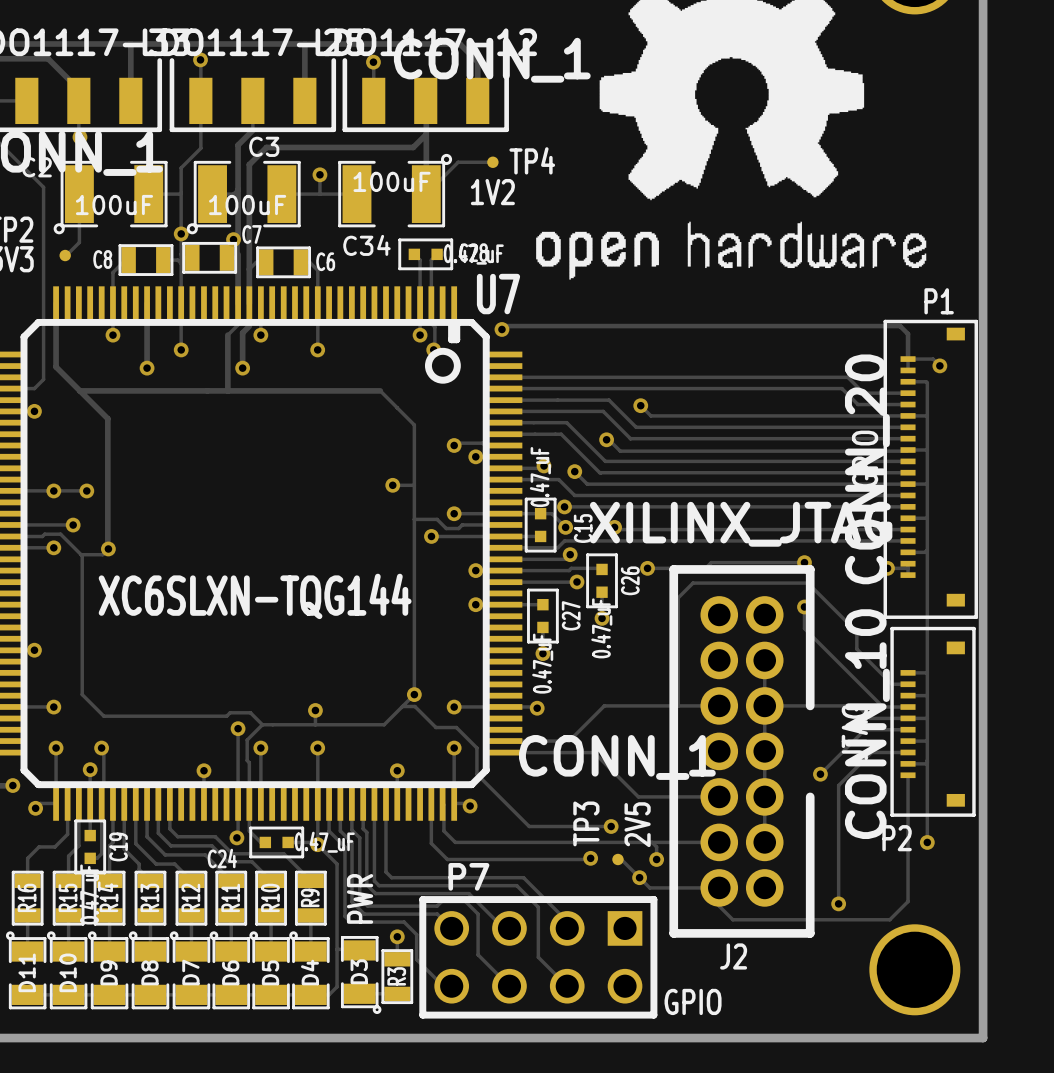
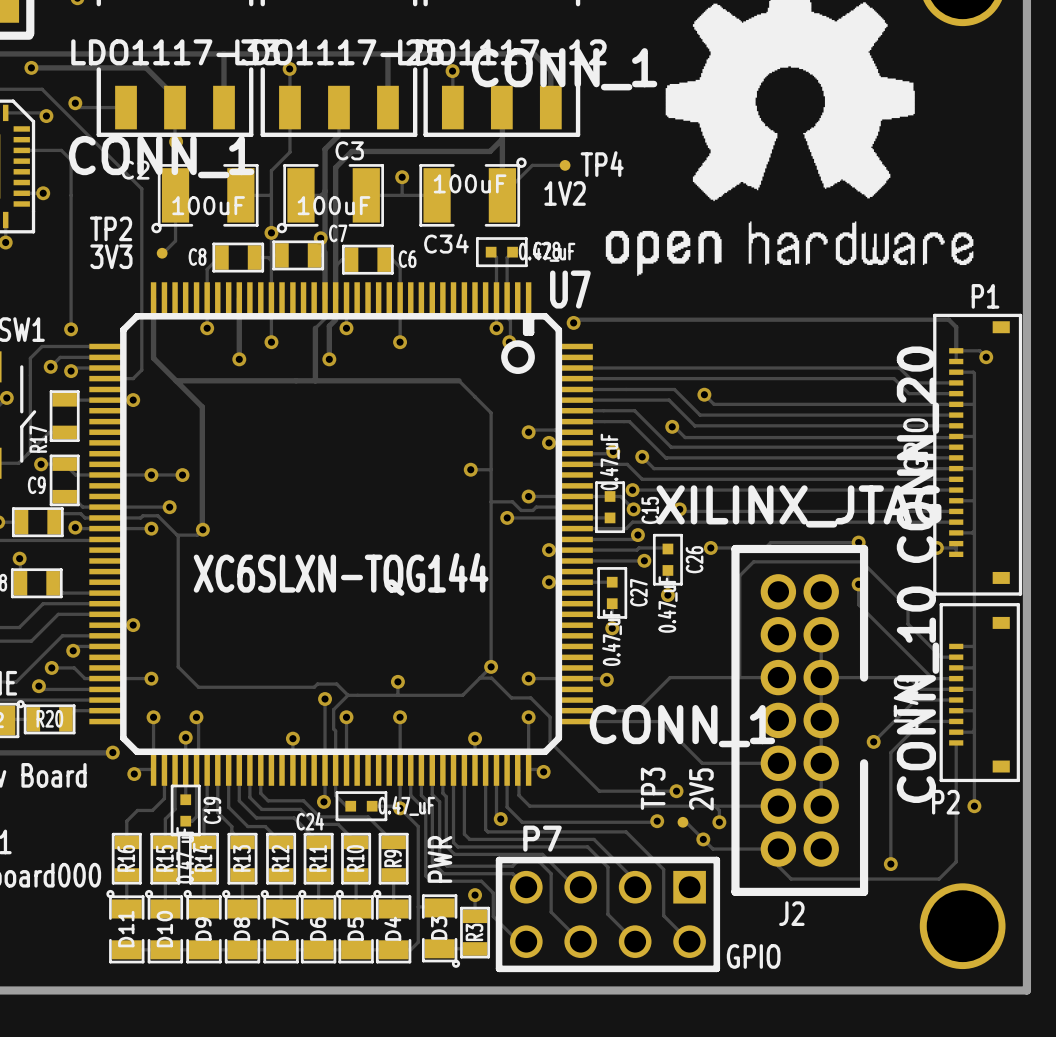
track: none -> (485, 769) (485, 829) (487, 831) (626, 831) (663, 869) (663, 915) (689, 941)
track: none -> (496, 769) (496, 814) (500, 819)
via: none -> (500, 819)

